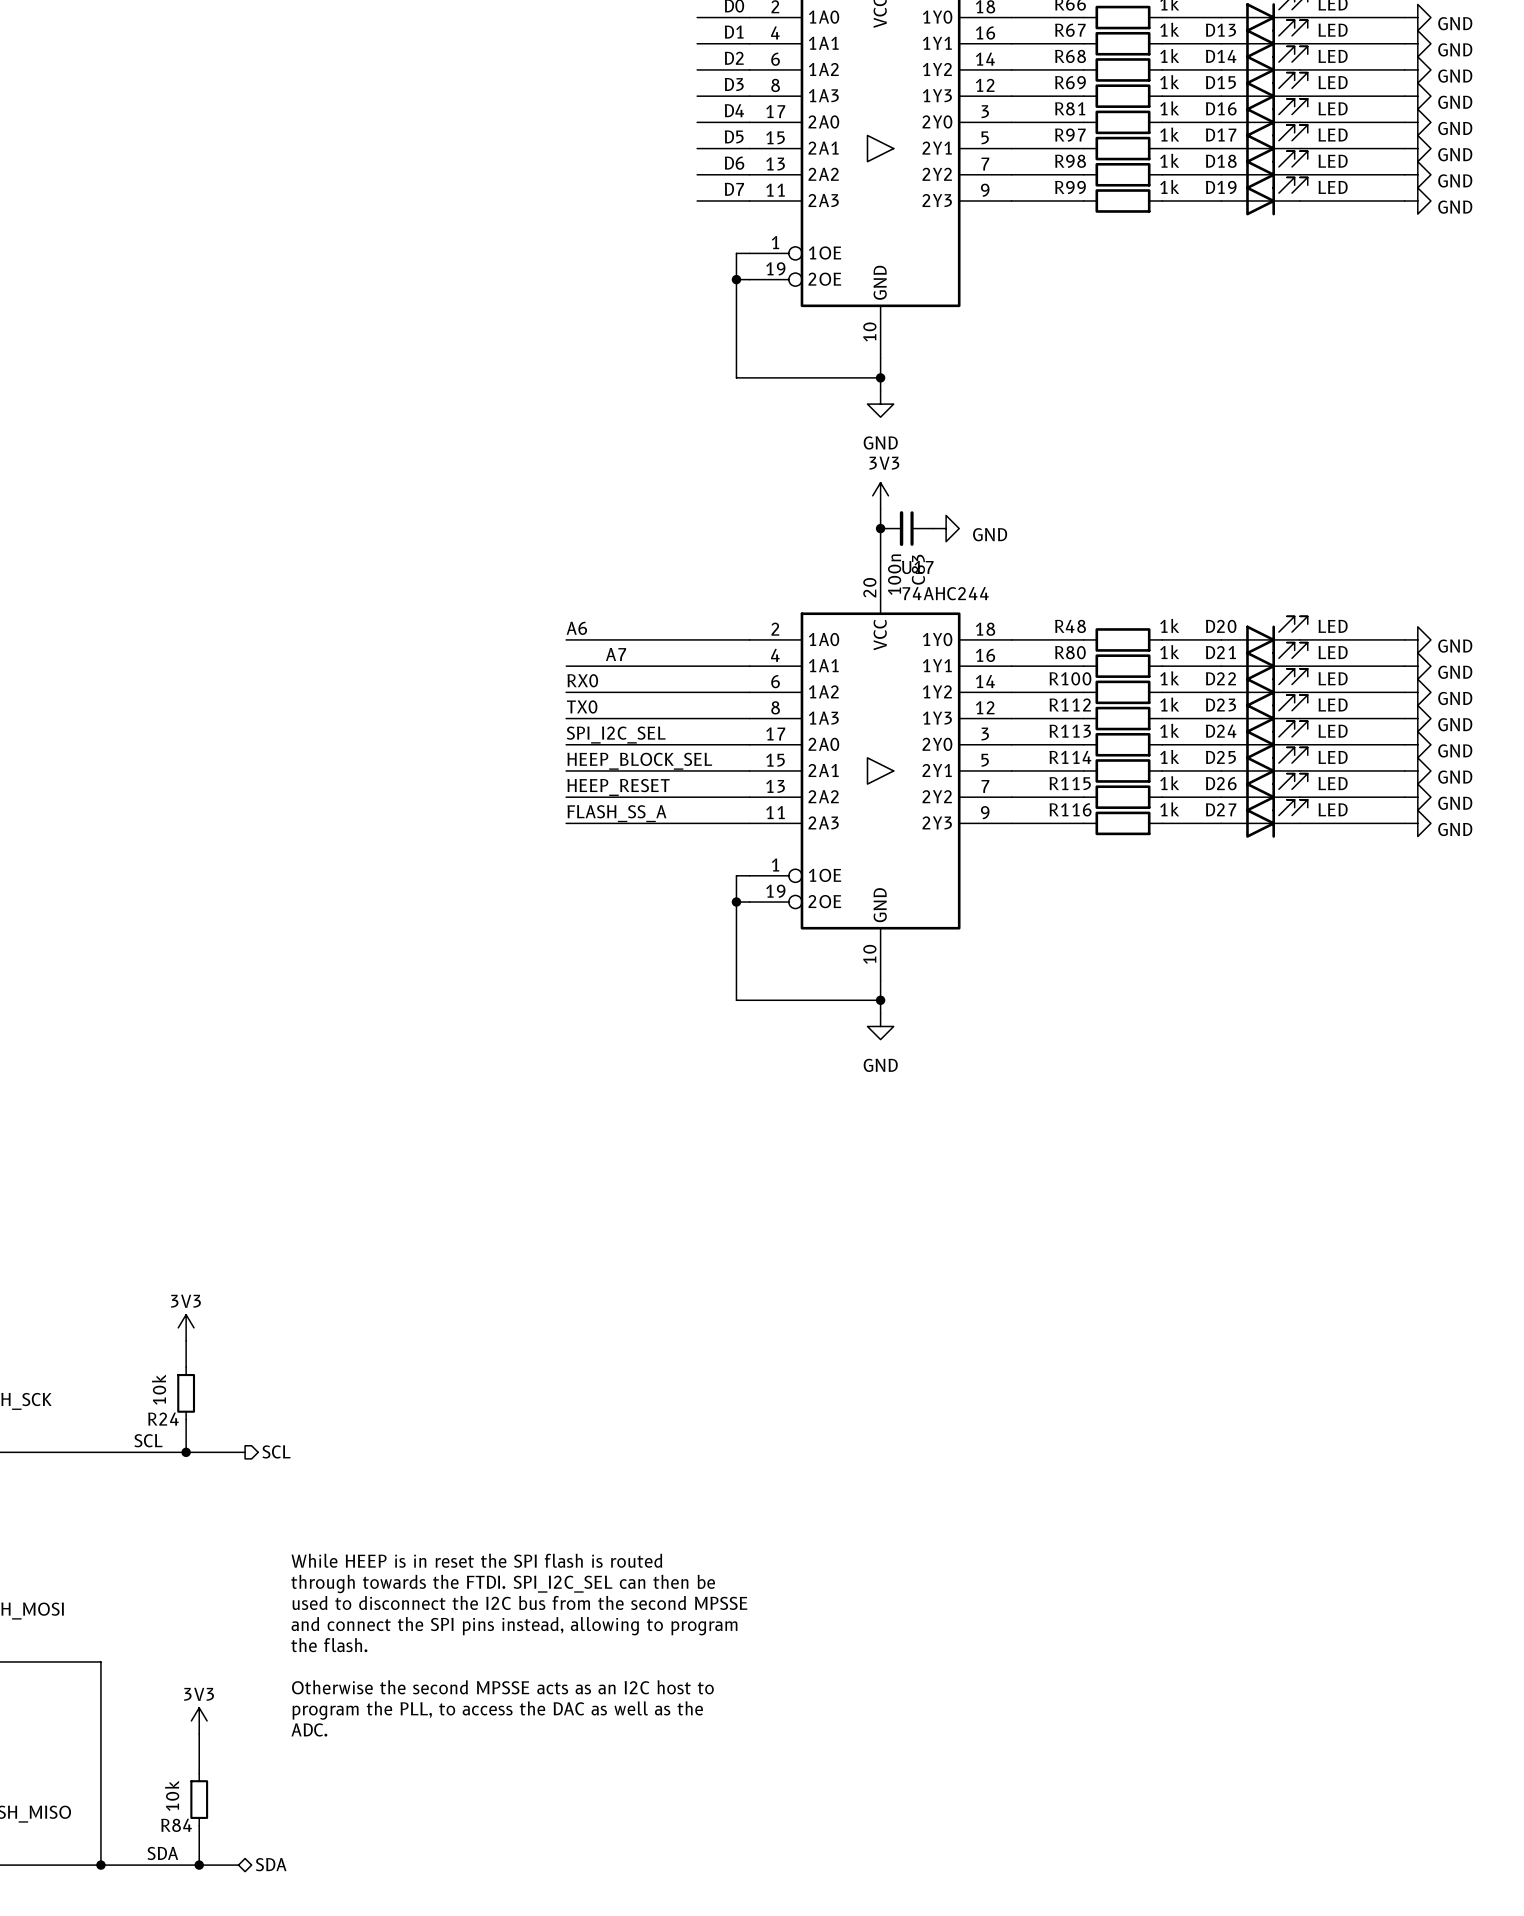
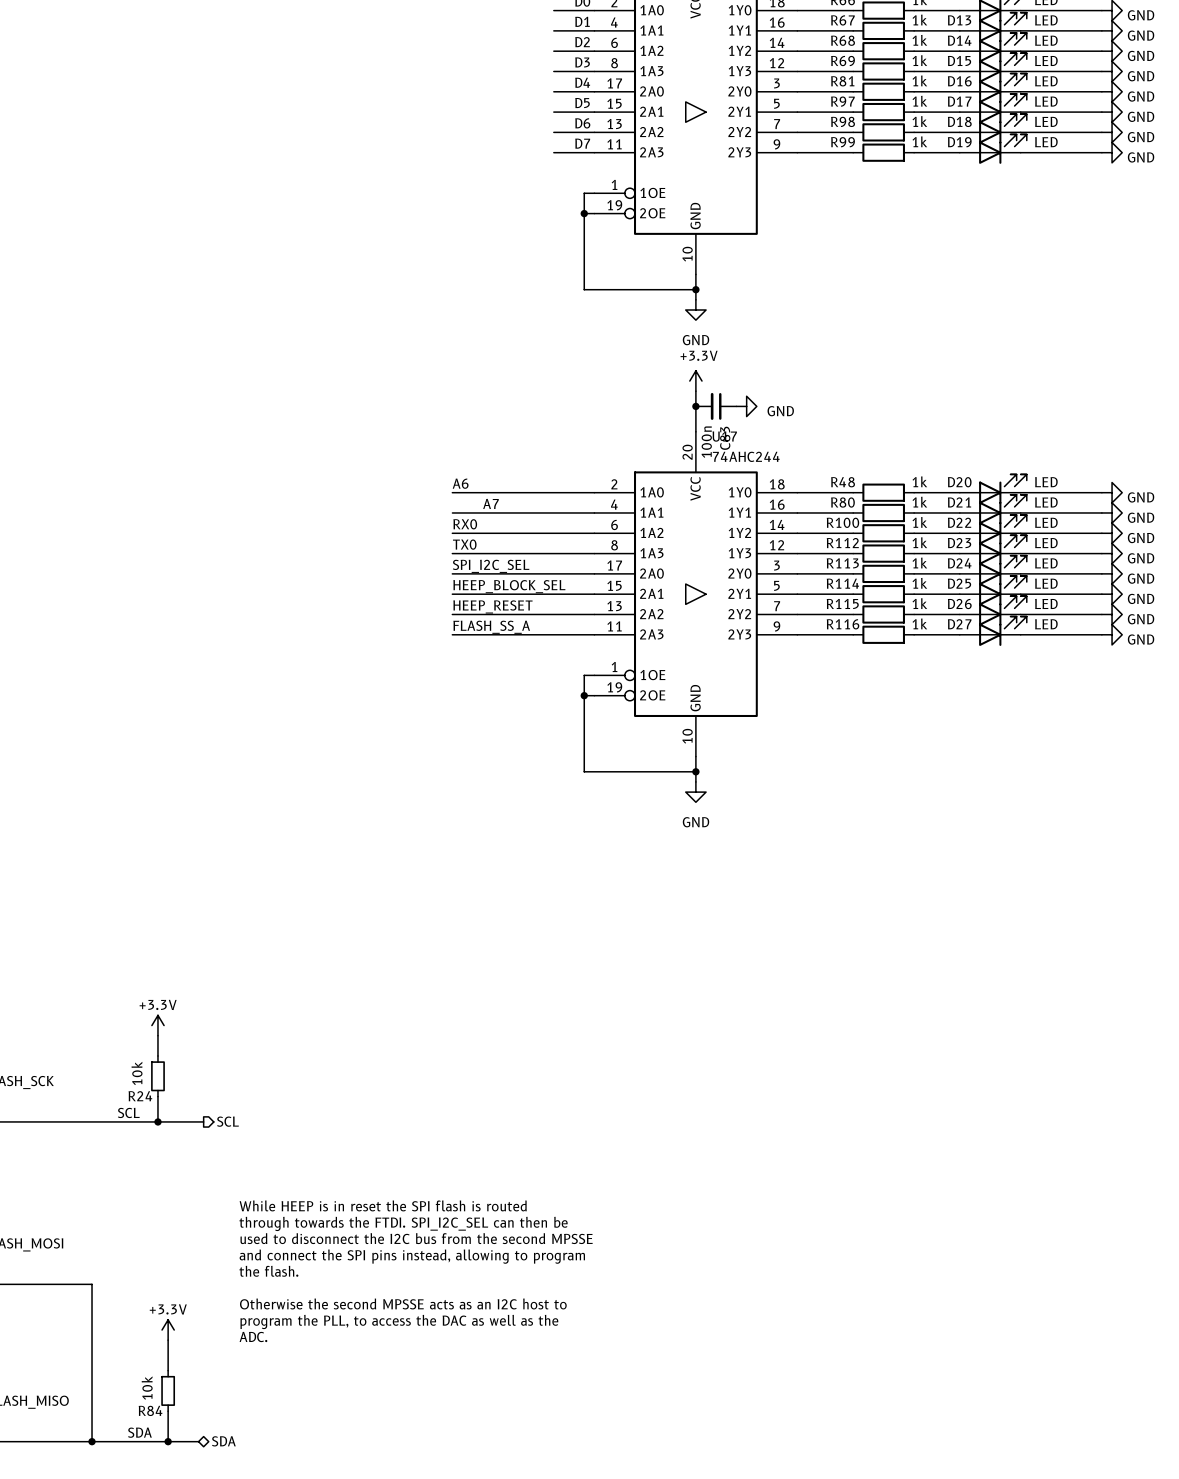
power symbol: 3V3 (880, 495) -> +3.3V (695, 381)
power symbol: 3V3 (186, 1327) -> +3.3V (157, 1025)
power symbol: 3V3 (199, 1720) -> +3.3V (168, 1330)

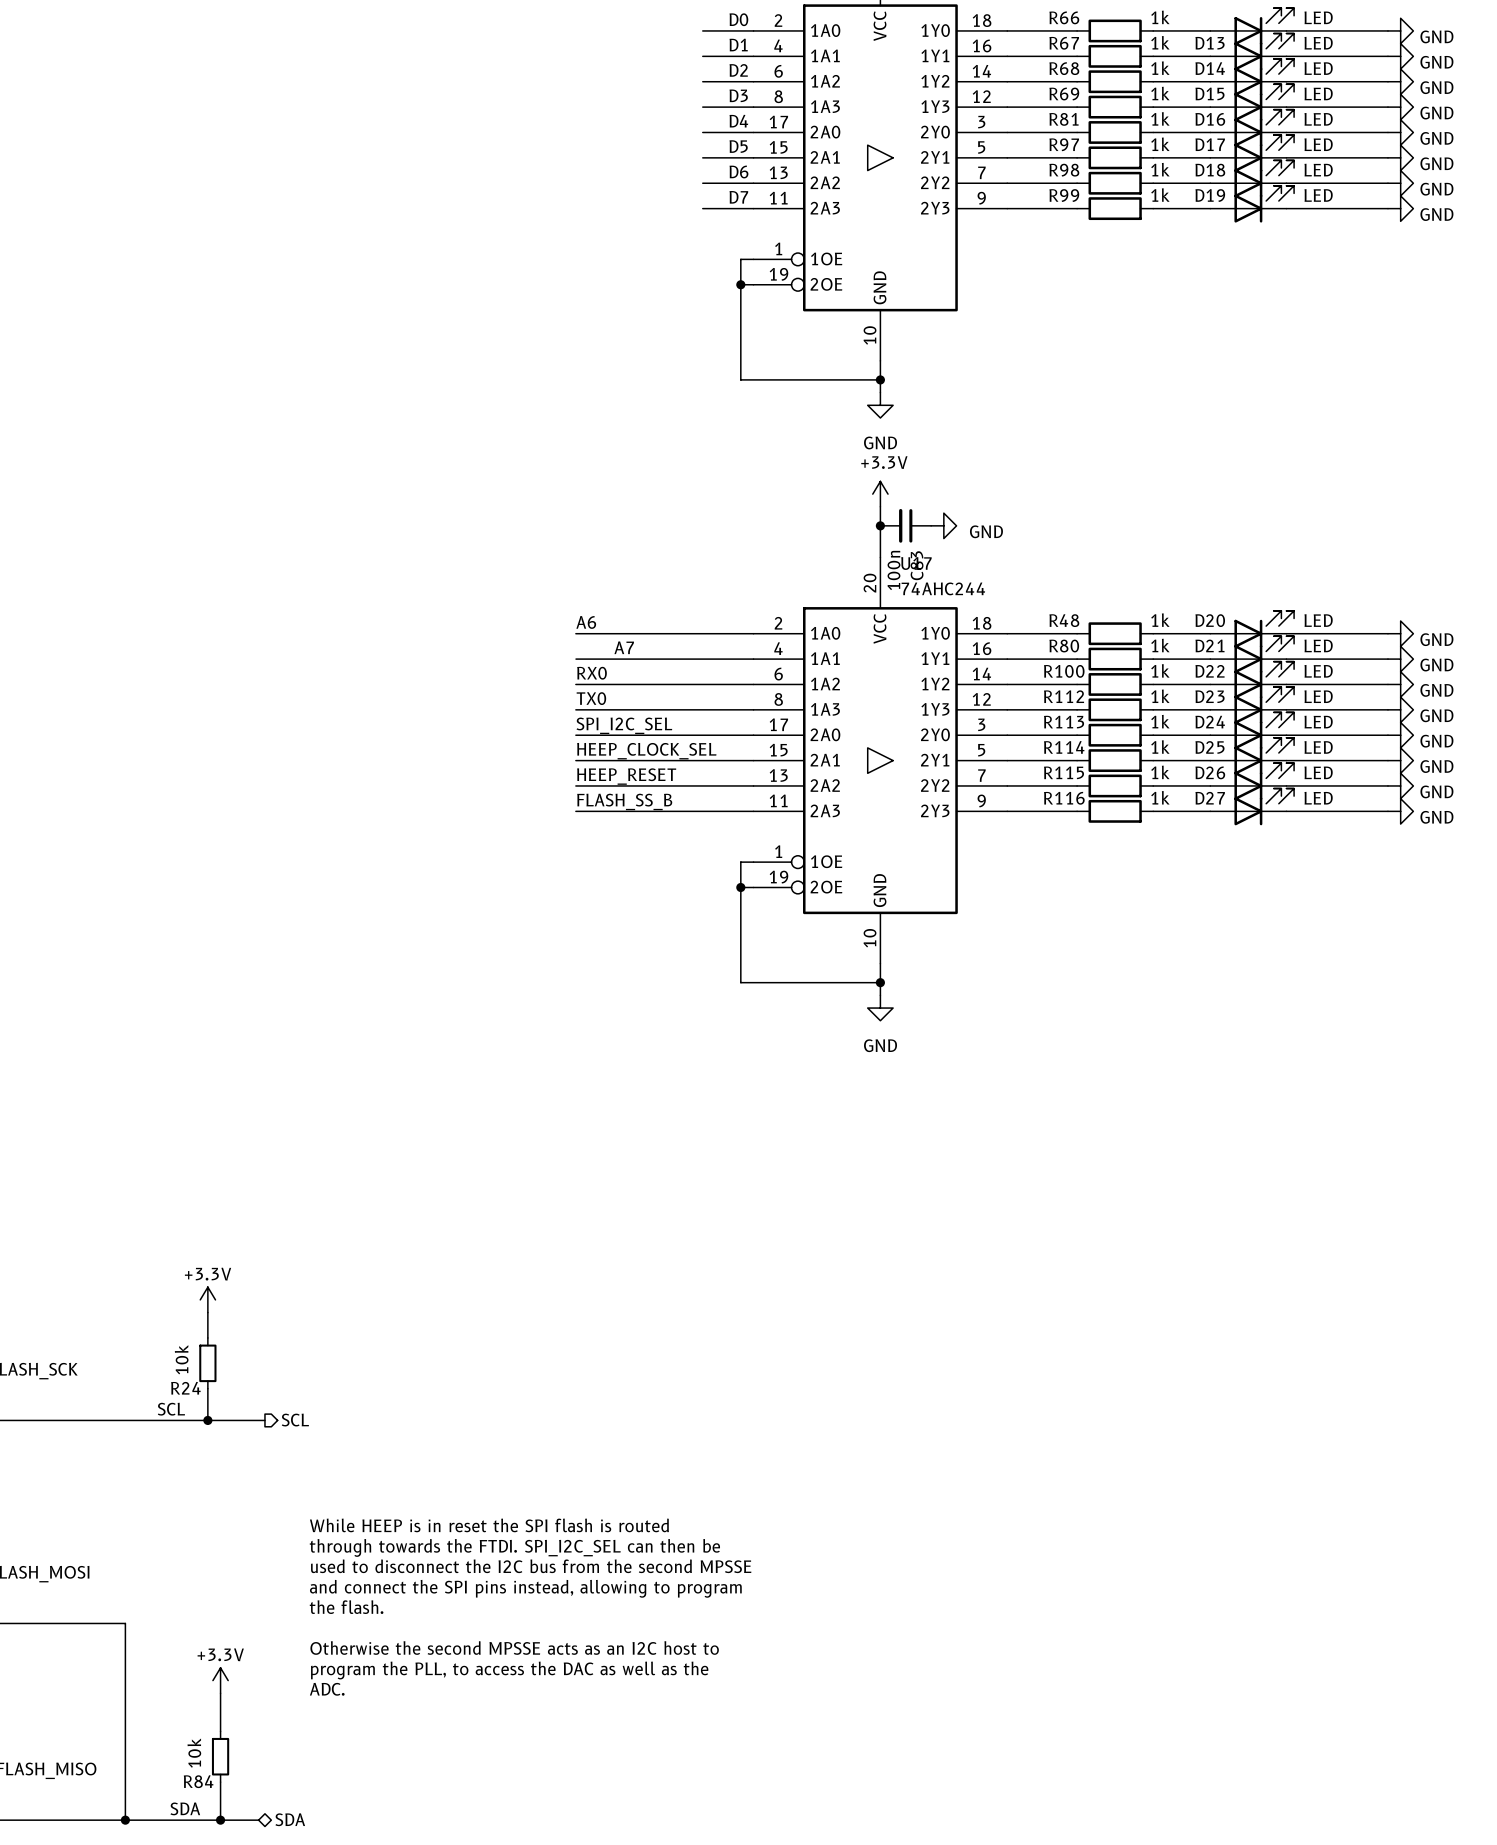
label: HEEP_BLOCK_SEL (509, 586) -> HEEP_CLOCK_SEL (646, 751)
label: FLASH_SS_A (491, 627) -> FLASH_SS_B (624, 801)

